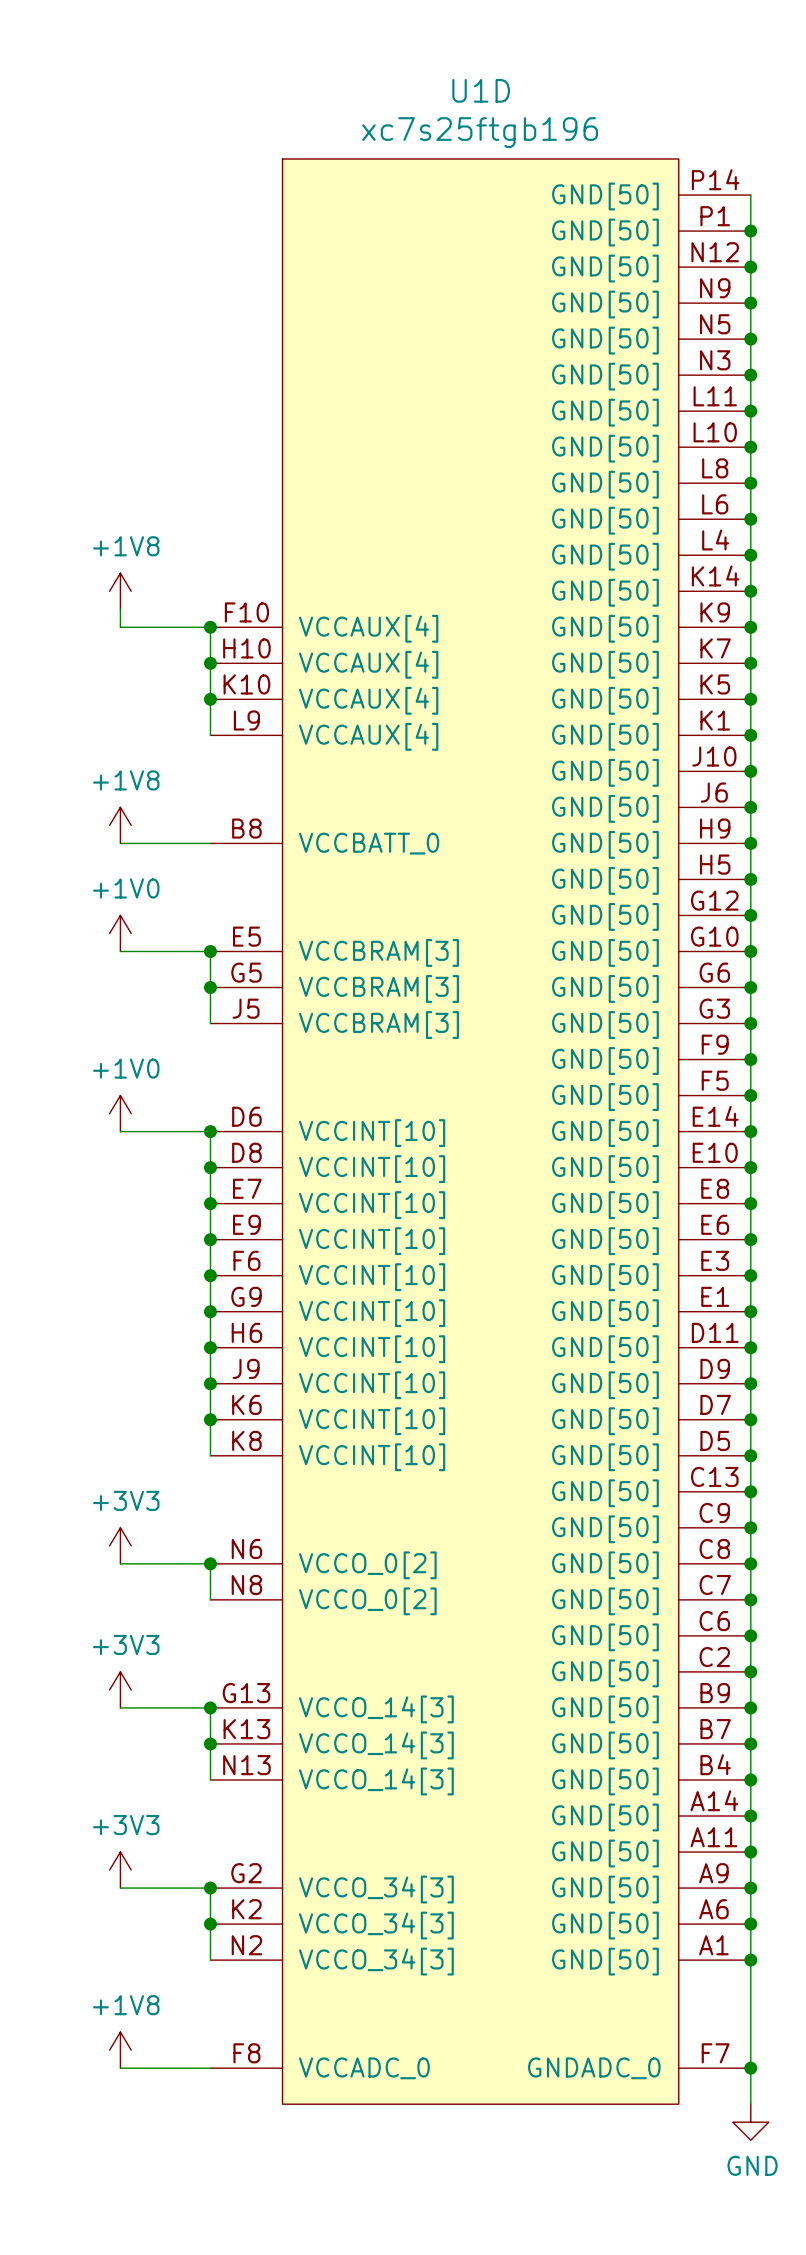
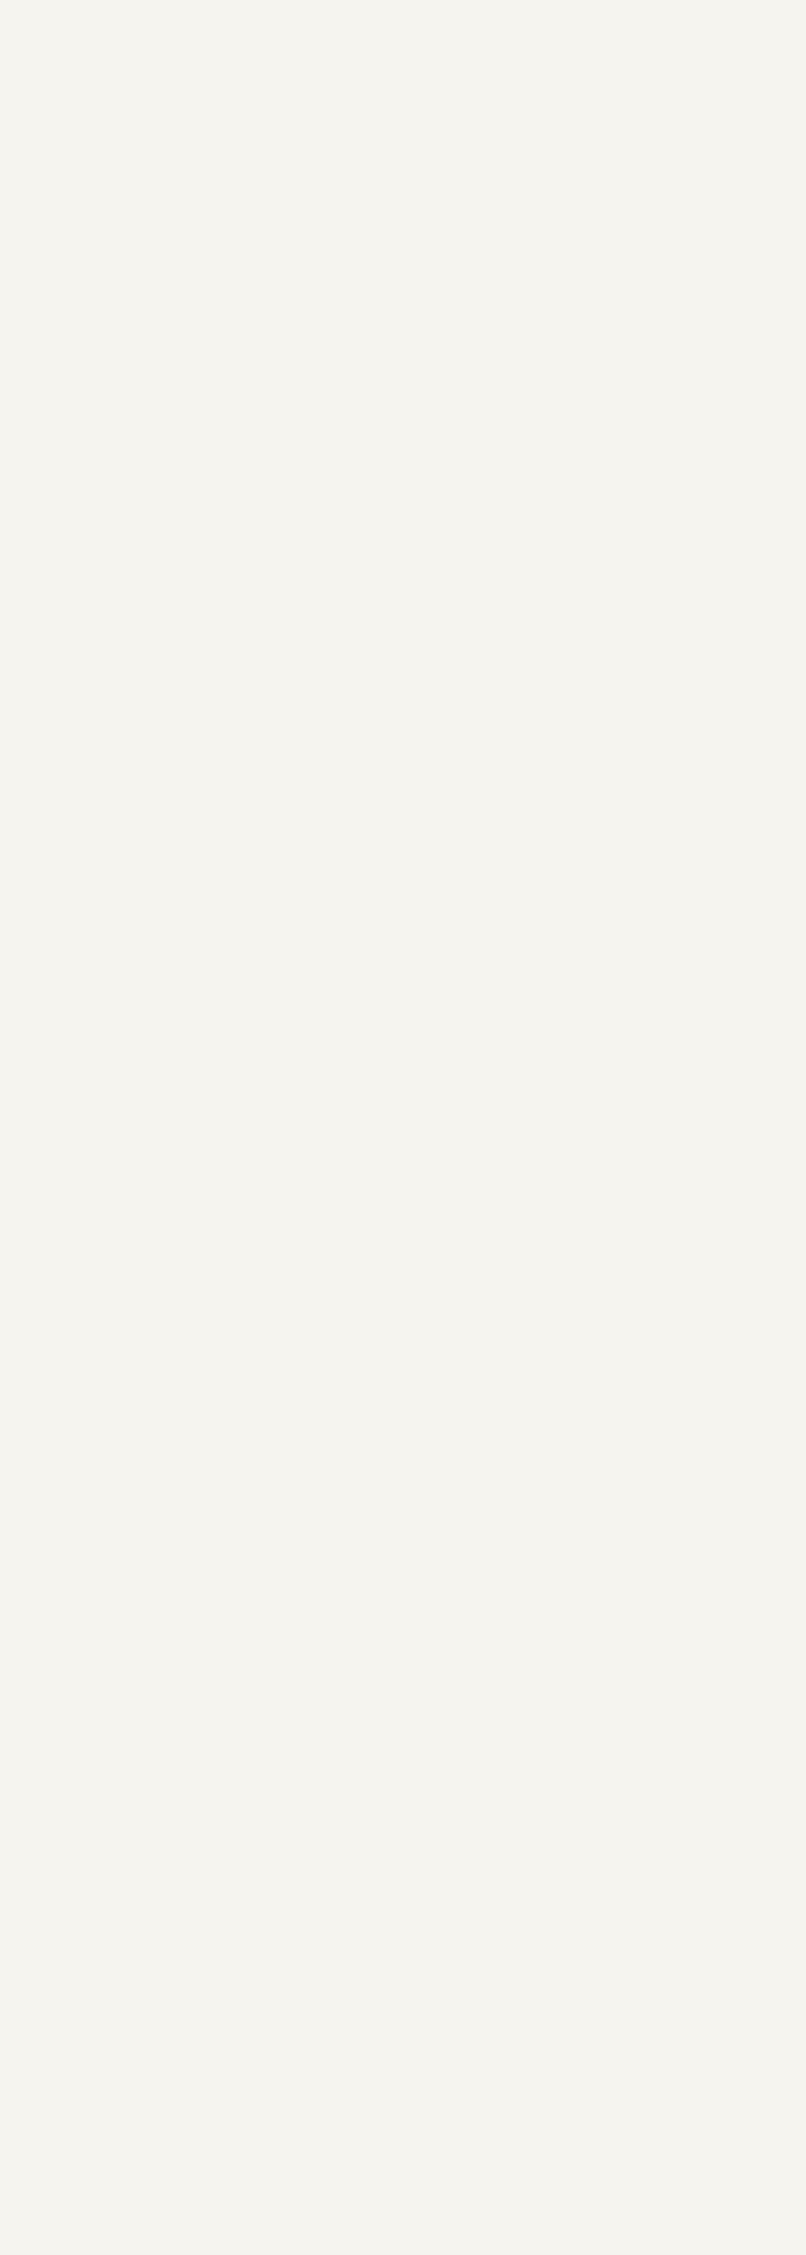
wire: (750, 195) (750, 2104) -> none
junction: (750, 231) -> none
junction: (750, 267) -> none
junction: (750, 303) -> none
junction: (750, 339) -> none
junction: (750, 375) -> none
junction: (750, 411) -> none
junction: (750, 447) -> none
junction: (750, 483) -> none
junction: (750, 519) -> none
junction: (750, 555) -> none
power symbol: +1V8 (120, 591) -> none
junction: (750, 591) -> none
wire: (120, 609) (120, 627) (210, 627) (210, 735) -> none
junction: (210, 627) -> none
junction: (750, 627) -> none
junction: (210, 663) -> none
junction: (750, 663) -> none
junction: (210, 699) -> none
junction: (750, 699) -> none
junction: (750, 735) -> none
junction: (750, 771) -> none
junction: (750, 807) -> none
power symbol: +1V8 (120, 825) -> none
wire: (120, 843) (210, 843) -> none
junction: (750, 843) -> none
junction: (750, 879) -> none
junction: (750, 915) -> none
power symbol: +1V0 (120, 933) -> none
wire: (120, 951) (210, 951) (210, 1023) -> none
junction: (210, 951) -> none
junction: (750, 951) -> none
junction: (210, 987) -> none
junction: (750, 987) -> none
junction: (750, 1023) -> none
junction: (750, 1059) -> none
junction: (750, 1095) -> none
power symbol: +1V0 (120, 1113) -> none
wire: (120, 1131) (210, 1131) (210, 1455) -> none
junction: (210, 1131) -> none
U1D: xc7s25ftgb196 (480, 1131) -> none
junction: (750, 1131) -> none
junction: (210, 1167) -> none
junction: (750, 1167) -> none
junction: (210, 1203) -> none
junction: (750, 1203) -> none
junction: (210, 1239) -> none
junction: (750, 1239) -> none
junction: (210, 1275) -> none
junction: (750, 1275) -> none
junction: (210, 1311) -> none
junction: (750, 1311) -> none
junction: (210, 1347) -> none
junction: (750, 1347) -> none
junction: (210, 1383) -> none
junction: (750, 1383) -> none
junction: (210, 1419) -> none
junction: (750, 1419) -> none
junction: (750, 1455) -> none
junction: (750, 1491) -> none
junction: (750, 1527) -> none
power symbol: +3V3 (120, 1545) -> none
wire: (120, 1563) (210, 1563) (210, 1599) -> none
junction: (210, 1563) -> none
junction: (750, 1563) -> none
junction: (750, 1599) -> none
junction: (750, 1635) -> none
junction: (750, 1671) -> none
power symbol: +3V3 (120, 1689) -> none
wire: (120, 1707) (210, 1707) (210, 1779) -> none
junction: (210, 1707) -> none
junction: (750, 1707) -> none
junction: (210, 1743) -> none
junction: (750, 1743) -> none
junction: (750, 1779) -> none
junction: (750, 1816) -> none
junction: (750, 1852) -> none
power symbol: +3V3 (120, 1870) -> none
wire: (120, 1888) (210, 1888) (210, 1960) -> none
junction: (210, 1888) -> none
junction: (750, 1888) -> none
junction: (210, 1924) -> none
junction: (750, 1924) -> none
junction: (750, 1960) -> none
power symbol: +1V8 (120, 2050) -> none
wire: (120, 2068) (210, 2068) -> none
junction: (750, 2068) -> none
power symbol: GND (750, 2122) -> none

